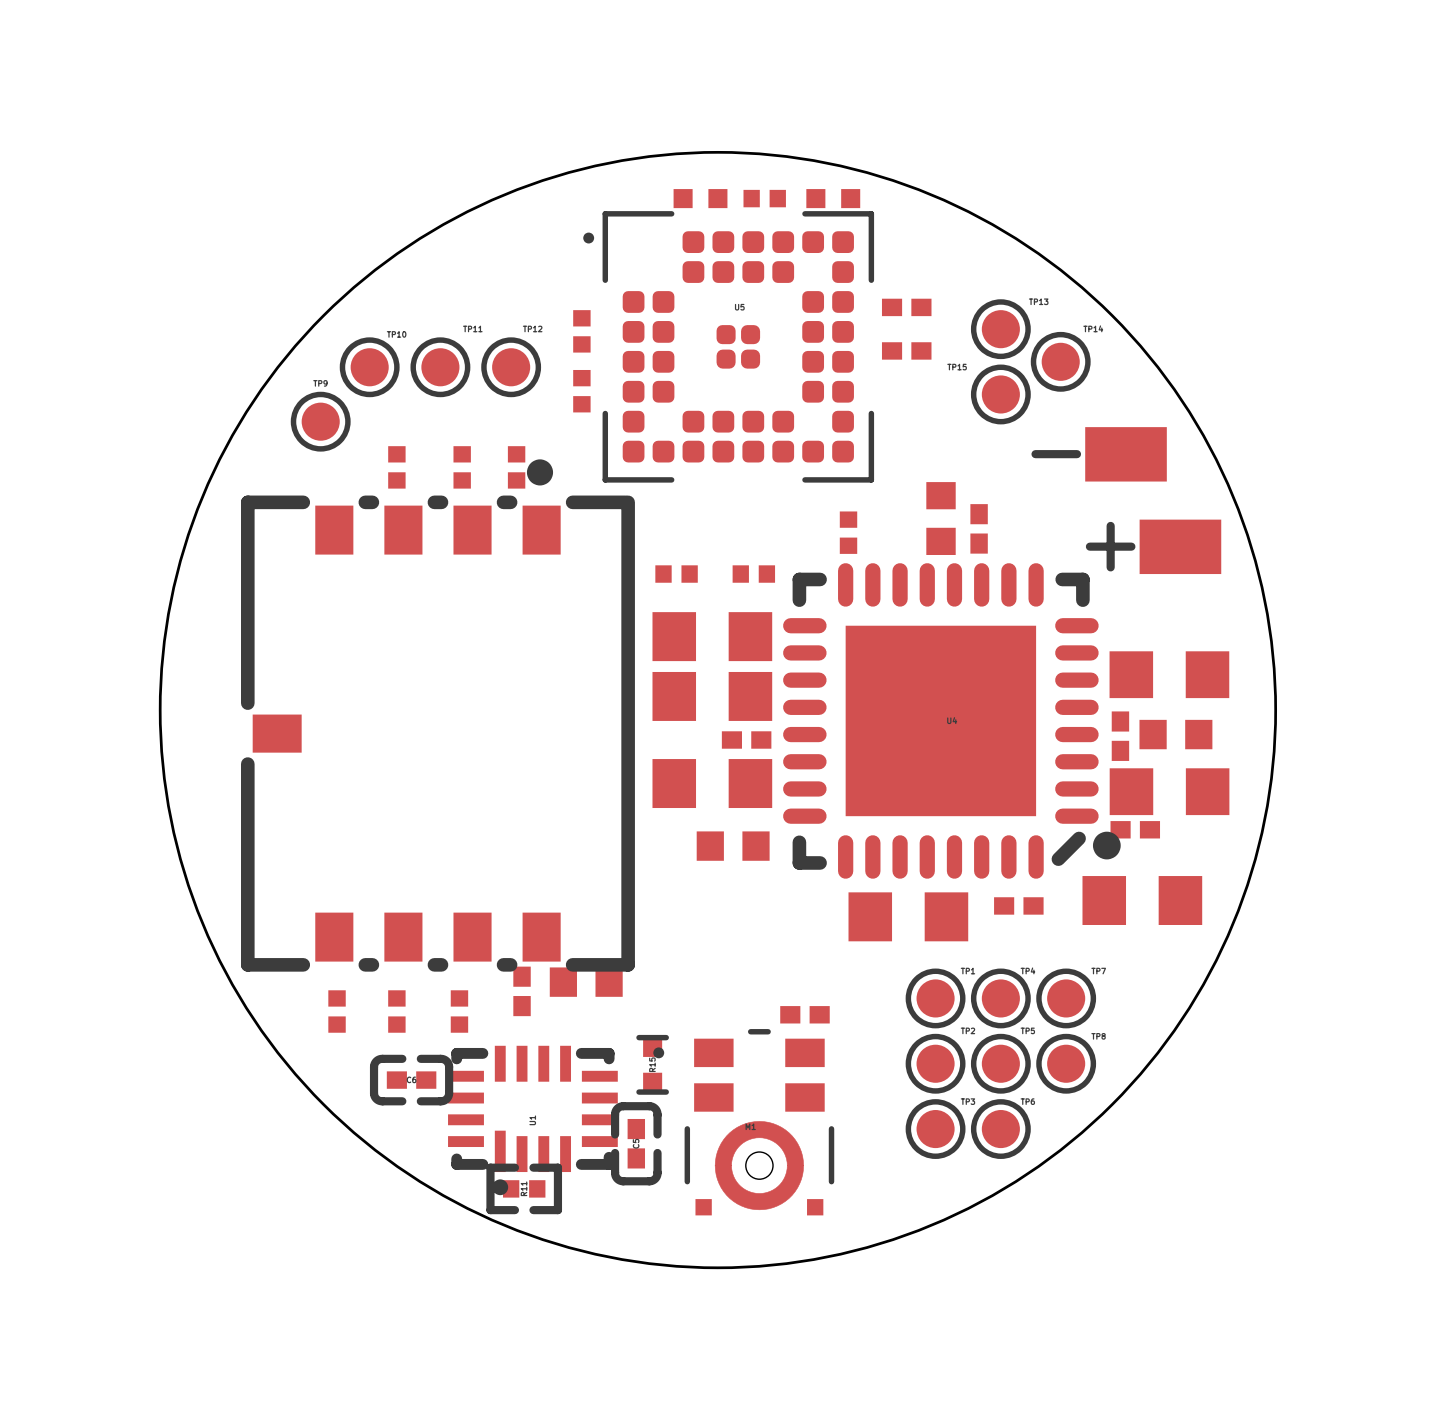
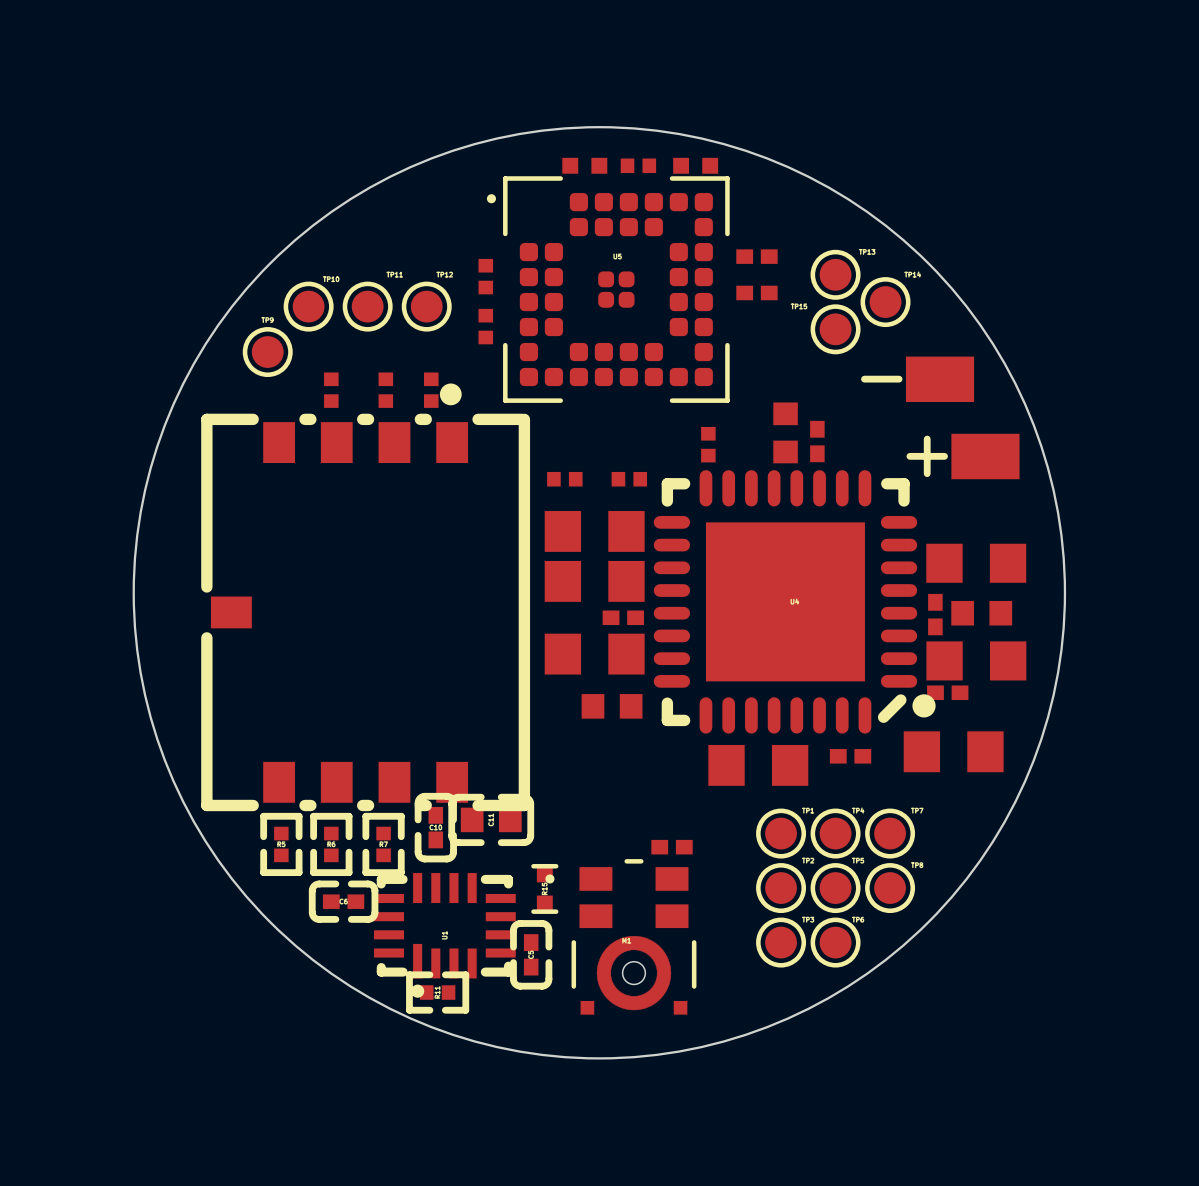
part: (586, 982) -> none
part: none -> (491, 819)
part: (522, 991) -> none
part: none -> (435, 827)
part: (337, 1011) -> none
part: none -> (281, 844)
part: (396, 1011) -> none
part: none -> (331, 844)
part: (459, 1011) -> none
part: none -> (383, 844)

